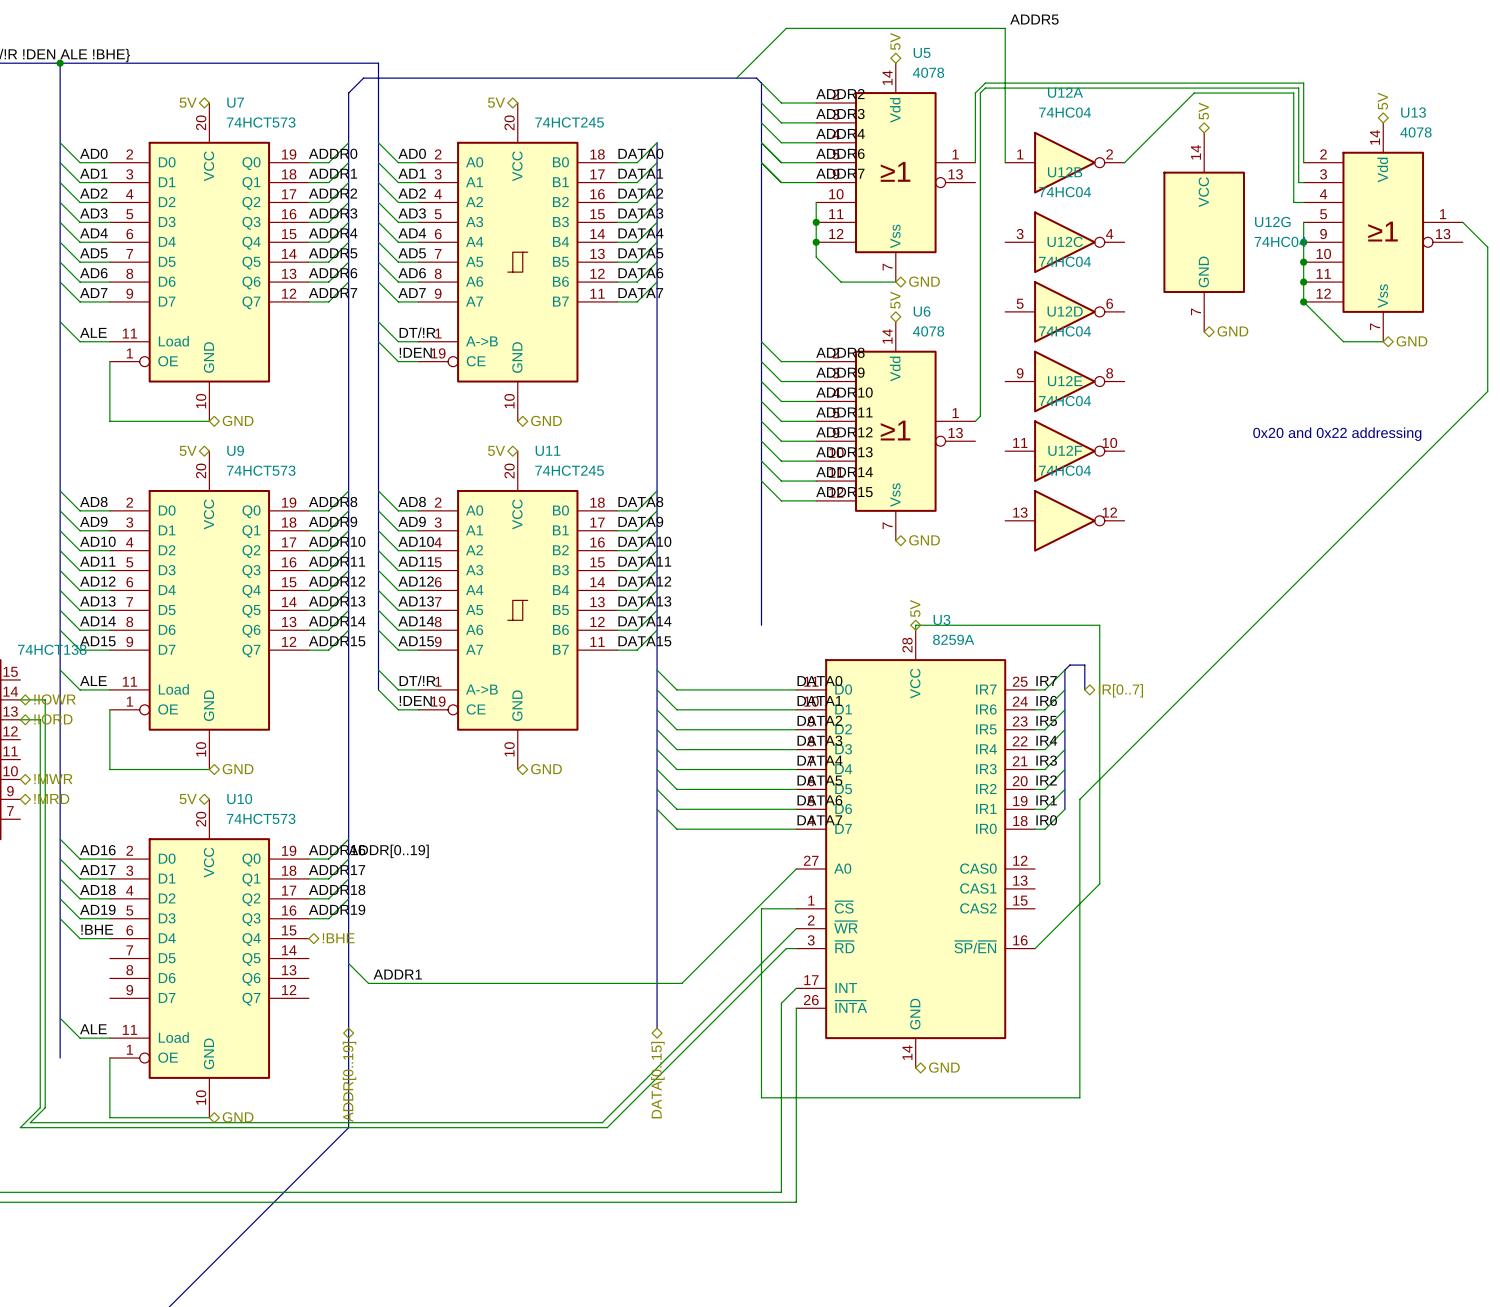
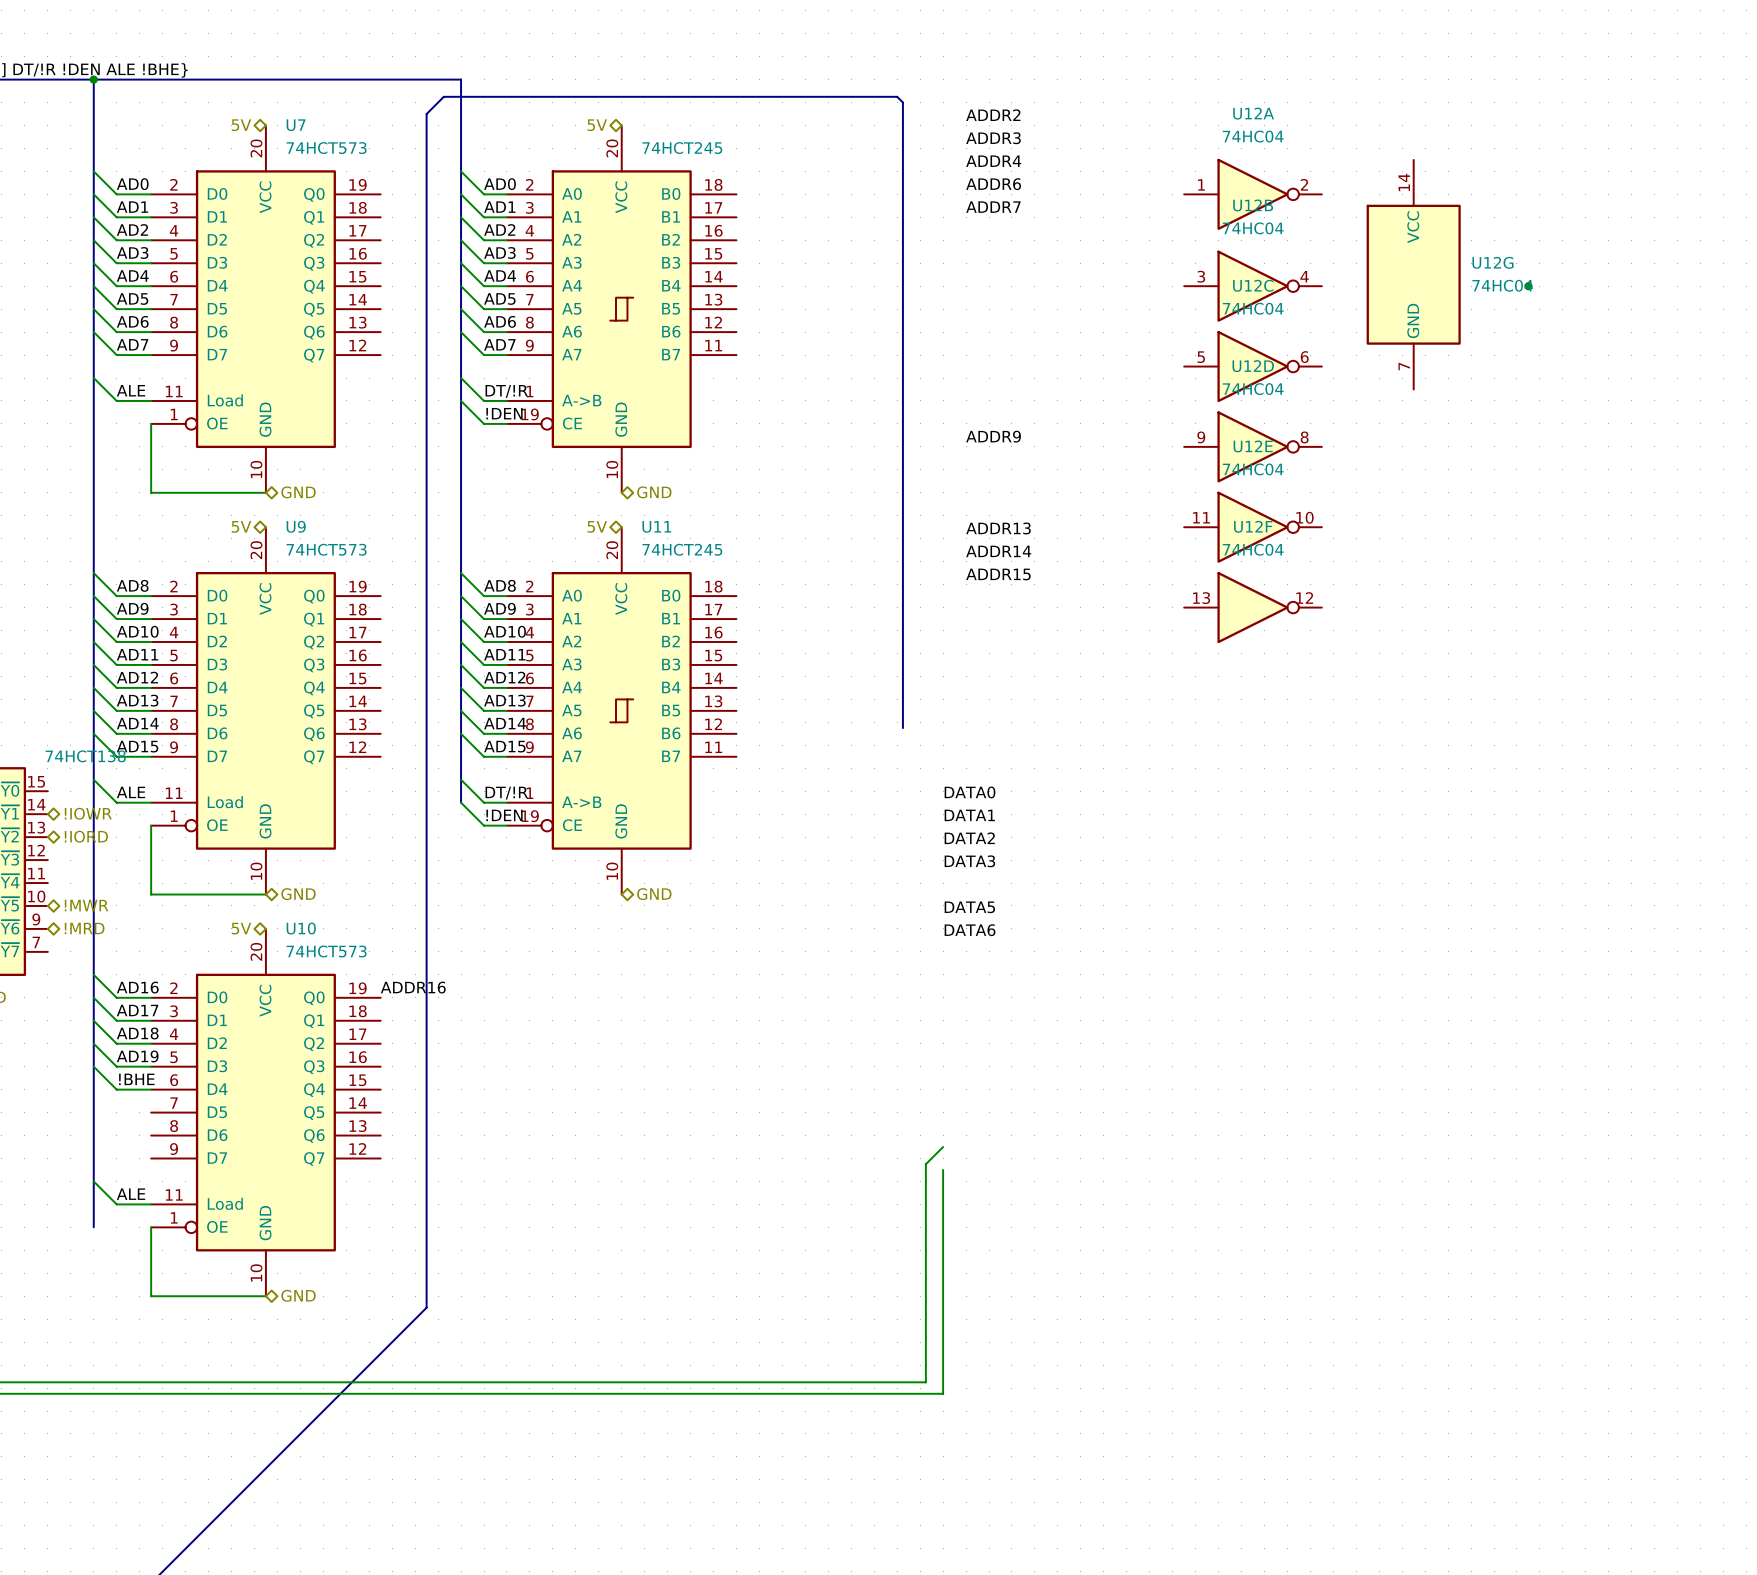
label: ADDR5 (1034, 19) -> none
hierarchical label: 5V (895, 41) -> none
wire: (736, 78) (786, 28) (1005, 28) (1005, 162) -> none
wire: (761, 83) (781, 102) (816, 102) -> none
hierarchical label: 5V (1382, 101) -> none
wire: (761, 102) (781, 122) (816, 122) -> none
hierarchical label: 5V (1203, 111) -> none
wire: (761, 122) (781, 142) (816, 142) -> none
wire: (348, 142) (328, 162) (308, 162) -> none
wire: (657, 142) (637, 162) (617, 162) -> none
bus: (657, 142) (657, 1028) -> none
wire: (761, 142) (781, 162) (816, 162) -> none
label: ADDR0 (333, 153) -> none
label: DATA0 (640, 153) -> none
wire: (348, 162) (328, 182) (308, 182) -> none
wire: (657, 162) (637, 182) (617, 182) -> none
wire: (761, 162) (781, 182) (816, 182) -> none
wire: (975, 162) (975, 93) (985, 83) (1303, 83) (1303, 162) -> none
wire: (1124, 162) (1194, 93) (1293, 93) (1293, 202) (1303, 202) -> none
U5: 4078 (895, 172) -> none
label: ADDR1 (333, 173) -> none
label: DATA1 (640, 173) -> none
wire: (348, 182) (328, 202) (308, 202) -> none
wire: (657, 182) (637, 202) (617, 202) -> none
wire: (1303, 182) (1298, 182) (1298, 88) (985, 88) (980, 93) (980, 416) (975, 421) -> none
label: ADDR2 (333, 193) -> none
label: DATA2 (640, 193) -> none
wire: (348, 202) (328, 222) (308, 222) -> none
wire: (657, 202) (637, 222) (617, 222) -> none
wire: (816, 202) (816, 257) (841, 282) (895, 282) -> none
label: ADDR3 (333, 213) -> none
label: DATA3 (640, 213) -> none
wire: (348, 222) (328, 242) (308, 242) -> none
wire: (657, 222) (637, 242) (617, 242) -> none
junction: (816, 222) -> none
wire: (1303, 222) (1303, 301) (1343, 341) (1383, 341) -> none
wire: (1462, 222) (1487, 247) (1487, 391) (1079, 799) (1079, 1097) (761, 1097) (761, 908) (796, 908) -> none
U13: 4078 (1383, 232) -> none
label: ADDR4 (333, 233) -> none
label: DATA4 (640, 233) -> none
wire: (348, 242) (328, 262) (308, 262) -> none
wire: (657, 242) (637, 262) (617, 262) -> none
junction: (816, 242) -> none
label: ADDR5 (333, 253) -> none
label: DATA5 (640, 253) -> none
wire: (348, 262) (328, 282) (308, 282) -> none
wire: (657, 262) (637, 282) (617, 282) -> none
junction: (1303, 262) -> none
label: ADDR6 (333, 273) -> none
label: DATA6 (640, 273) -> none
hierarchical label: GND (924, 281) -> none
wire: (348, 282) (328, 301) (308, 301) -> none
wire: (657, 282) (637, 301) (617, 301) -> none
junction: (1303, 282) -> none
label: ADDR7 (333, 293) -> none
label: DATA7 (640, 293) -> none
hierarchical label: 5V (895, 300) -> none
junction: (1303, 301) -> none
hierarchical label: GND (1232, 331) -> none
wire: (761, 341) (781, 361) (816, 361) -> none
hierarchical label: GND (1411, 341) -> none
label: ADDR8 (840, 352) -> none
wire: (761, 361) (781, 381) (816, 381) -> none
wire: (761, 381) (781, 401) (816, 401) -> none
label: ADDR10 (844, 392) -> none
wire: (761, 401) (781, 421) (816, 421) -> none
label: ADDR11 (844, 412) -> none
wire: (761, 421) (781, 441) (816, 441) -> none
U6: 4078 (895, 431) -> none
label: ADDR12 (844, 432) -> none
text: 0x20 and 0x22 addressing (1337, 434) -> none
wire: (761, 441) (781, 461) (816, 461) -> none
wire: (761, 461) (781, 481) (816, 481) -> none
wire: (761, 481) (781, 500) (816, 500) -> none
wire: (348, 490) (328, 510) (308, 510) -> none
wire: (657, 490) (637, 510) (617, 510) -> none
label: ADDR8 (333, 501) -> none
label: DATA8 (640, 501) -> none
wire: (348, 510) (328, 530) (308, 530) -> none
wire: (657, 510) (637, 530) (617, 530) -> none
label: ADDR9 (333, 521) -> none
label: DATA9 (640, 521) -> none
wire: (348, 530) (328, 550) (308, 550) -> none
wire: (657, 530) (637, 550) (617, 550) -> none
hierarchical label: GND (924, 540) -> none
label: ADDR10 (337, 541) -> none
label: DATA10 (644, 541) -> none
wire: (348, 550) (328, 570) (308, 570) -> none
wire: (657, 550) (637, 570) (617, 570) -> none
label: ADDR11 (337, 561) -> none
label: DATA11 (644, 561) -> none
wire: (348, 570) (328, 590) (308, 590) -> none
wire: (657, 570) (637, 590) (617, 590) -> none
label: ADDR12 (337, 581) -> none
label: DATA12 (644, 581) -> none
wire: (348, 590) (328, 610) (308, 610) -> none
wire: (657, 590) (637, 610) (617, 610) -> none
label: ADDR13 (337, 601) -> none
label: DATA13 (644, 601) -> none
hierarchical label: 5V (915, 608) -> none
wire: (348, 610) (328, 630) (308, 630) -> none
wire: (657, 610) (637, 630) (617, 630) -> none
label: ADDR14 (337, 621) -> none
label: DATA14 (644, 621) -> none
wire: (348, 630) (328, 650) (308, 650) -> none
wire: (657, 630) (637, 650) (617, 650) -> none
wire: (915, 630) (915, 625) (1099, 625) (1099, 883) (1035, 948) -> none
label: ADDR15 (337, 641) -> none
label: DATA15 (644, 641) -> none
wire: (657, 670) (676, 689) (796, 689) -> none
wire: (1064, 670) (1045, 689) (1035, 689) -> none
label: IR7 (1046, 681) -> none
wire: (657, 689) (676, 709) (796, 709) -> none
wire: (1064, 689) (1045, 709) (1035, 709) -> none
bus: (1084, 689) (1084, 665) (1069, 665) (1064, 670) (1064, 809) -> none
hierarchical label: IR[0..7] (1120, 690) -> none
wire: (20, 699) (45, 699) (45, 1107) (30, 1122) (602, 1122) (796, 928) -> none
label: IR6 (1046, 700) -> none
wire: (657, 709) (676, 729) (796, 729) -> none
wire: (1064, 709) (1045, 729) (1035, 729) -> none
wire: (20, 719) (40, 719) (40, 1107) (20, 1127) (607, 1127) (786, 948) (796, 948) -> none
label: IR5 (1046, 720) -> none
wire: (657, 729) (676, 749) (796, 749) -> none
wire: (1064, 729) (1045, 749) (1035, 749) -> none
label: IR4 (1046, 740) -> none
wire: (657, 749) (676, 769) (796, 769) -> none
wire: (1064, 749) (1045, 769) (1035, 769) -> none
label: DATA4 (820, 760) -> none
label: IR3 (1046, 760) -> none
wire: (657, 769) (676, 789) (796, 789) -> none
wire: (1064, 769) (1045, 789) (1035, 789) -> none
label: IR2 (1046, 780) -> none
wire: (657, 789) (676, 809) (796, 809) -> none
wire: (1064, 789) (1045, 809) (1035, 809) -> none
label: IR1 (1046, 800) -> none
wire: (657, 809) (676, 829) (796, 829) -> none
wire: (1064, 809) (1045, 829) (1035, 829) -> none
label: DATA7 (819, 820) -> none
label: IR0 (1046, 820) -> none
wire: (348, 839) (328, 859) (308, 859) -> none
U3: 8259A (915, 849) -> none
label: ADDR[0..19] (388, 851) -> none
wire: (348, 859) (328, 878) (308, 878) -> none
wire: (796, 869) (681, 983) (368, 983) (348, 963) -> none
label: ADDR17 (337, 870) -> none
wire: (348, 878) (328, 898) (308, 898) -> none
label: ADDR18 (337, 889) -> none
wire: (348, 898) (328, 918) (308, 918) -> none
label: ADDR19 (337, 909) -> none
hierarchical label: !BHE (338, 938) -> none
label: ADDR1 (397, 974) -> none
hierarchical label: GND (944, 1067) -> none
hierarchical label: DATA[0..15] (657, 1080) -> none
hierarchical label: ADDR[0..19] (349, 1081) -> none

